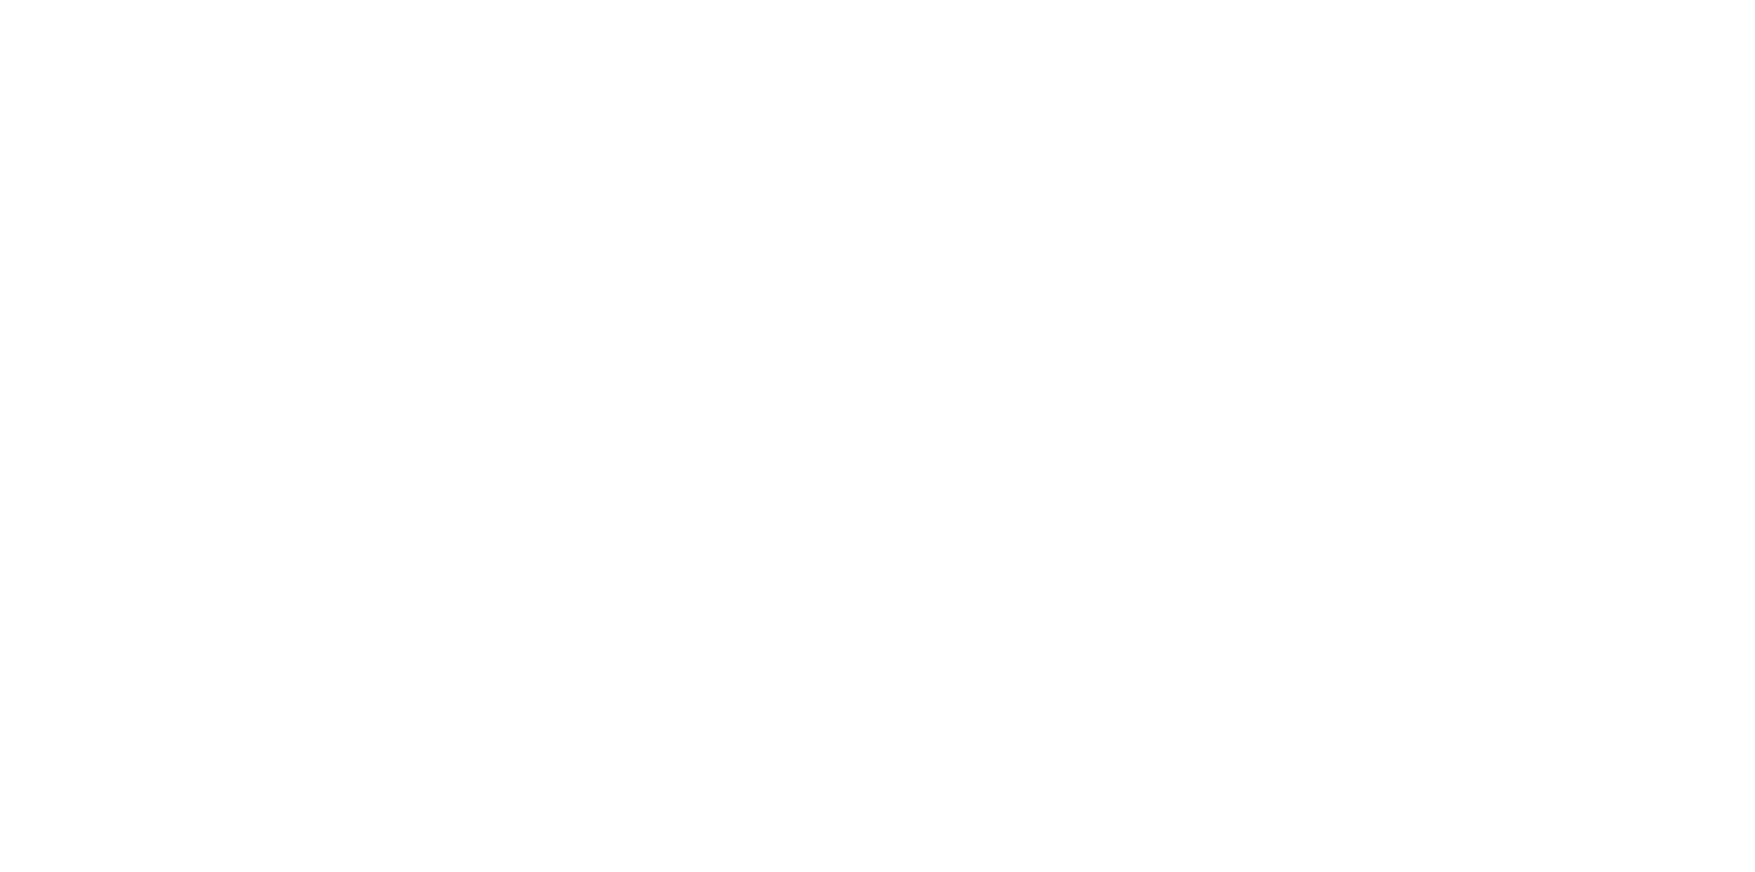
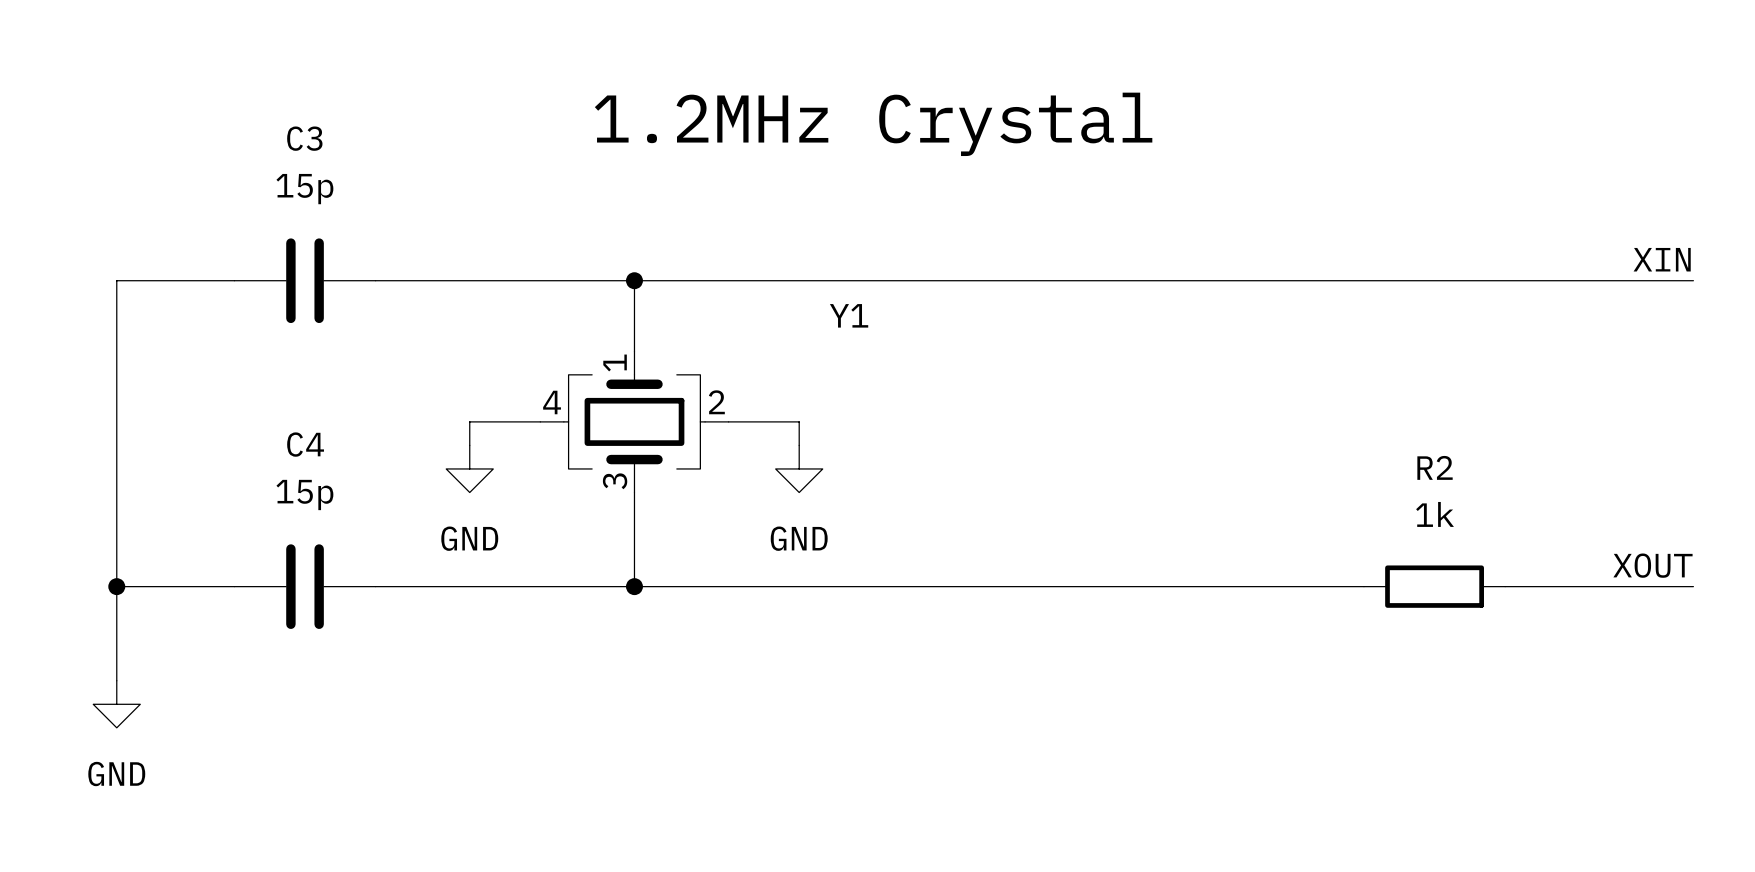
text: none -> 1.2MHz Crystal (873, 124)
label: none -> XIN (1662, 259)
wire: none -> (234, 280) (116, 280) (116, 680)
C3: none -> 15p (305, 280)
wire: none -> (375, 280) (1693, 280)
wire: none -> (634, 280) (634, 351)
junction: none -> (634, 280)
wire: none -> (540, 421) (469, 421) (469, 445)
Y1: none -> (634, 421)
wire: none -> (728, 421) (799, 421) (799, 445)
power symbol: none -> GND (469, 468)
power symbol: none -> GND (799, 468)
wire: none -> (634, 492) (634, 586)
label: none -> XOUT (1652, 565)
wire: none -> (116, 586) (234, 586)
junction: none -> (116, 586)
C4: none -> 15p (305, 586)
wire: none -> (375, 586) (1363, 586)
junction: none -> (634, 586)
R2: none -> 1k (1434, 586)
wire: none -> (1505, 586) (1693, 586)
power symbol: none -> GND (116, 704)

